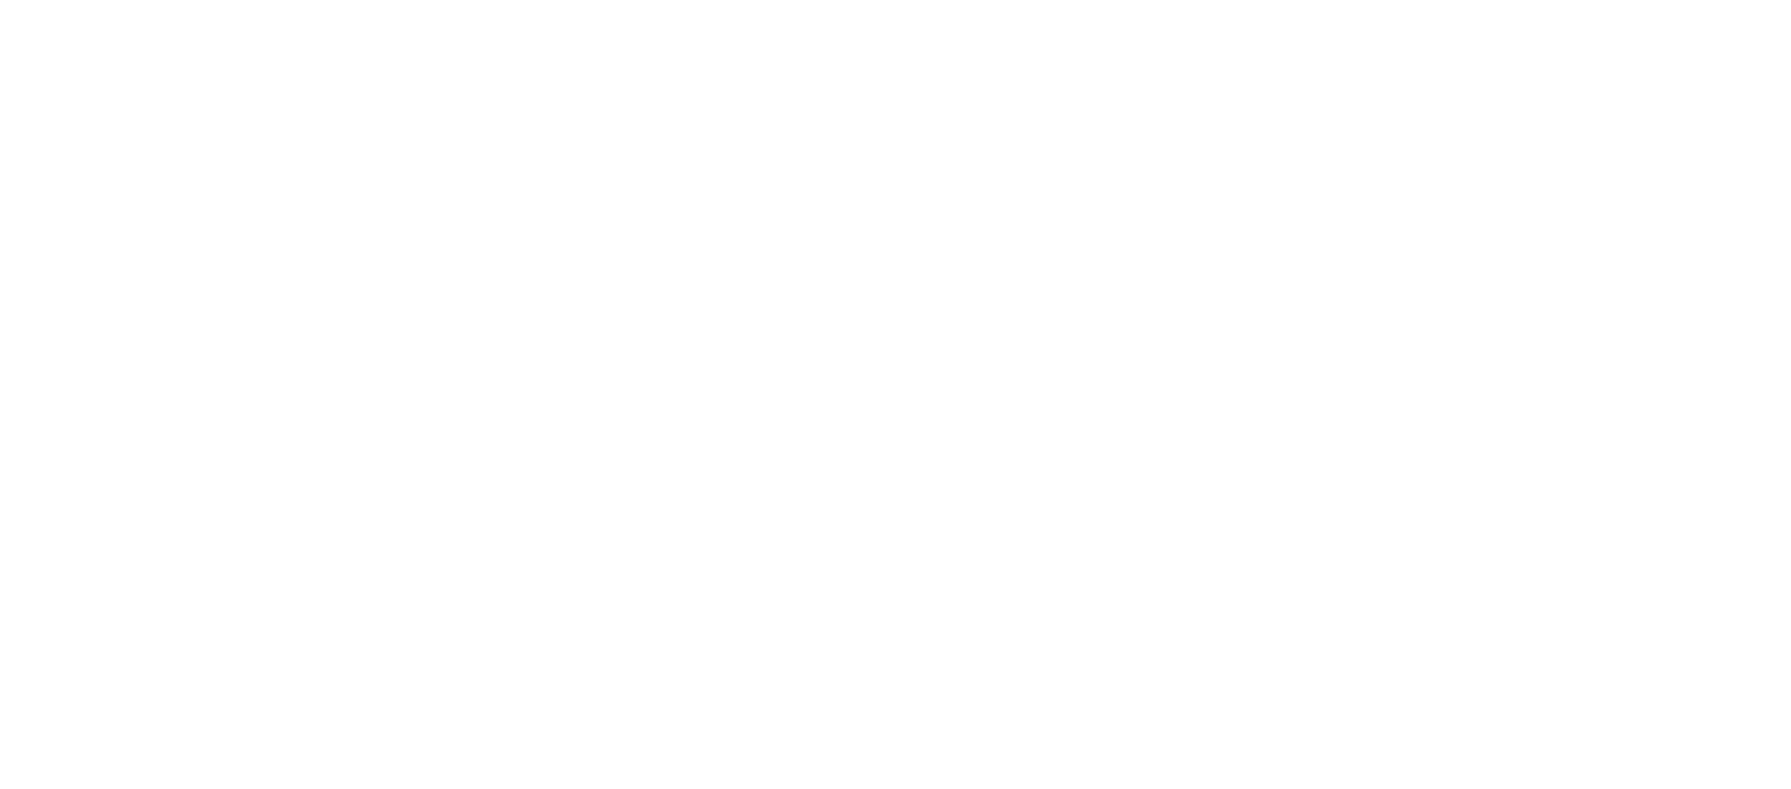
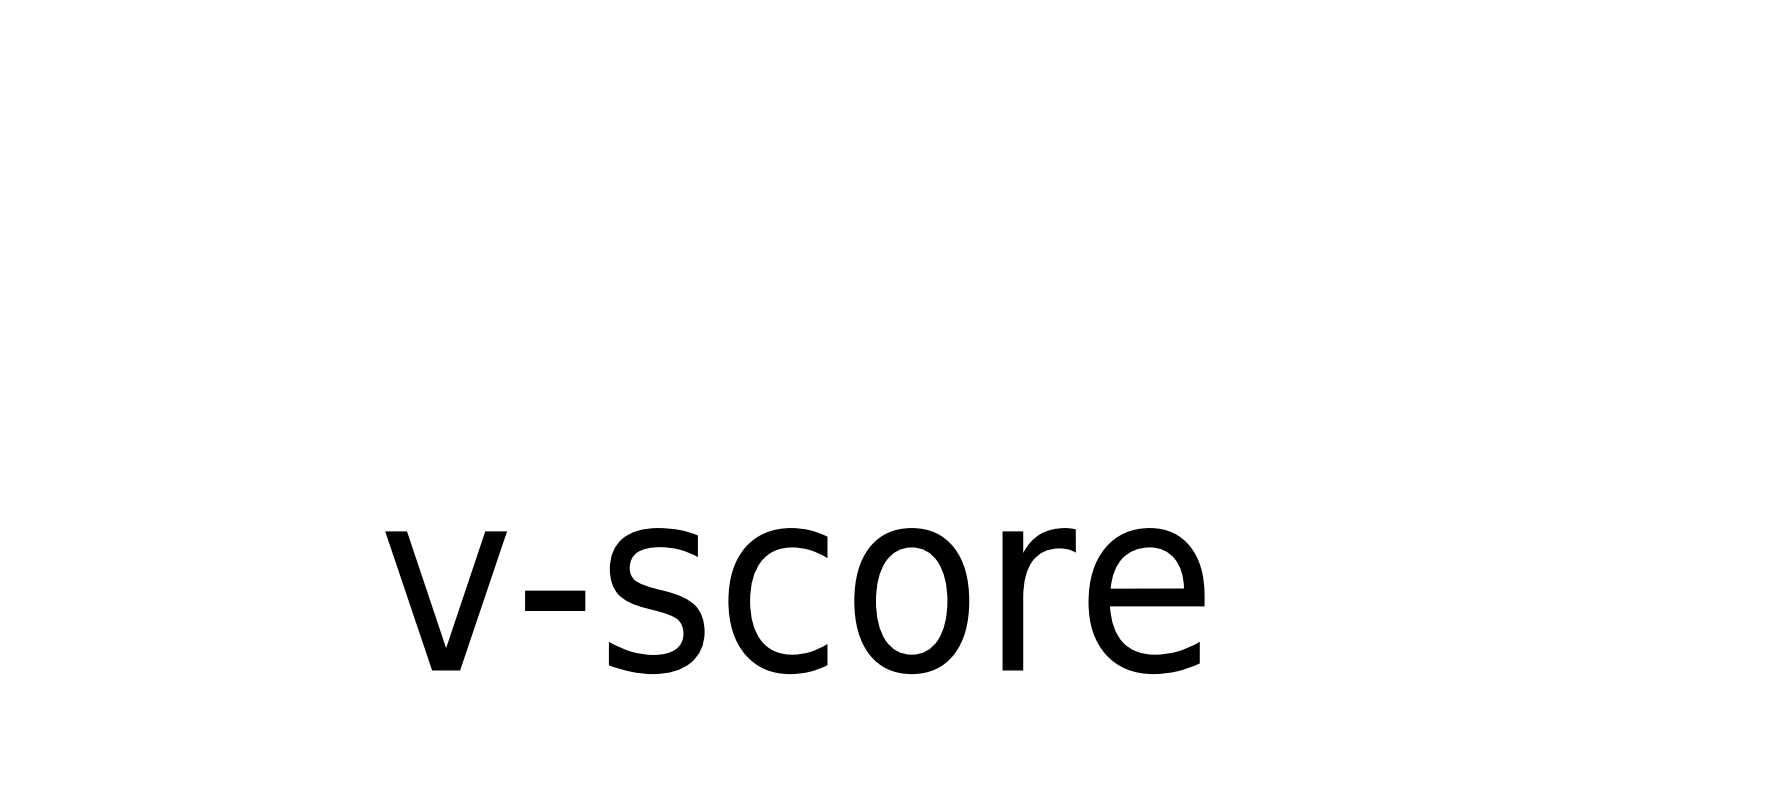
text: none -> v-score (794, 601)

